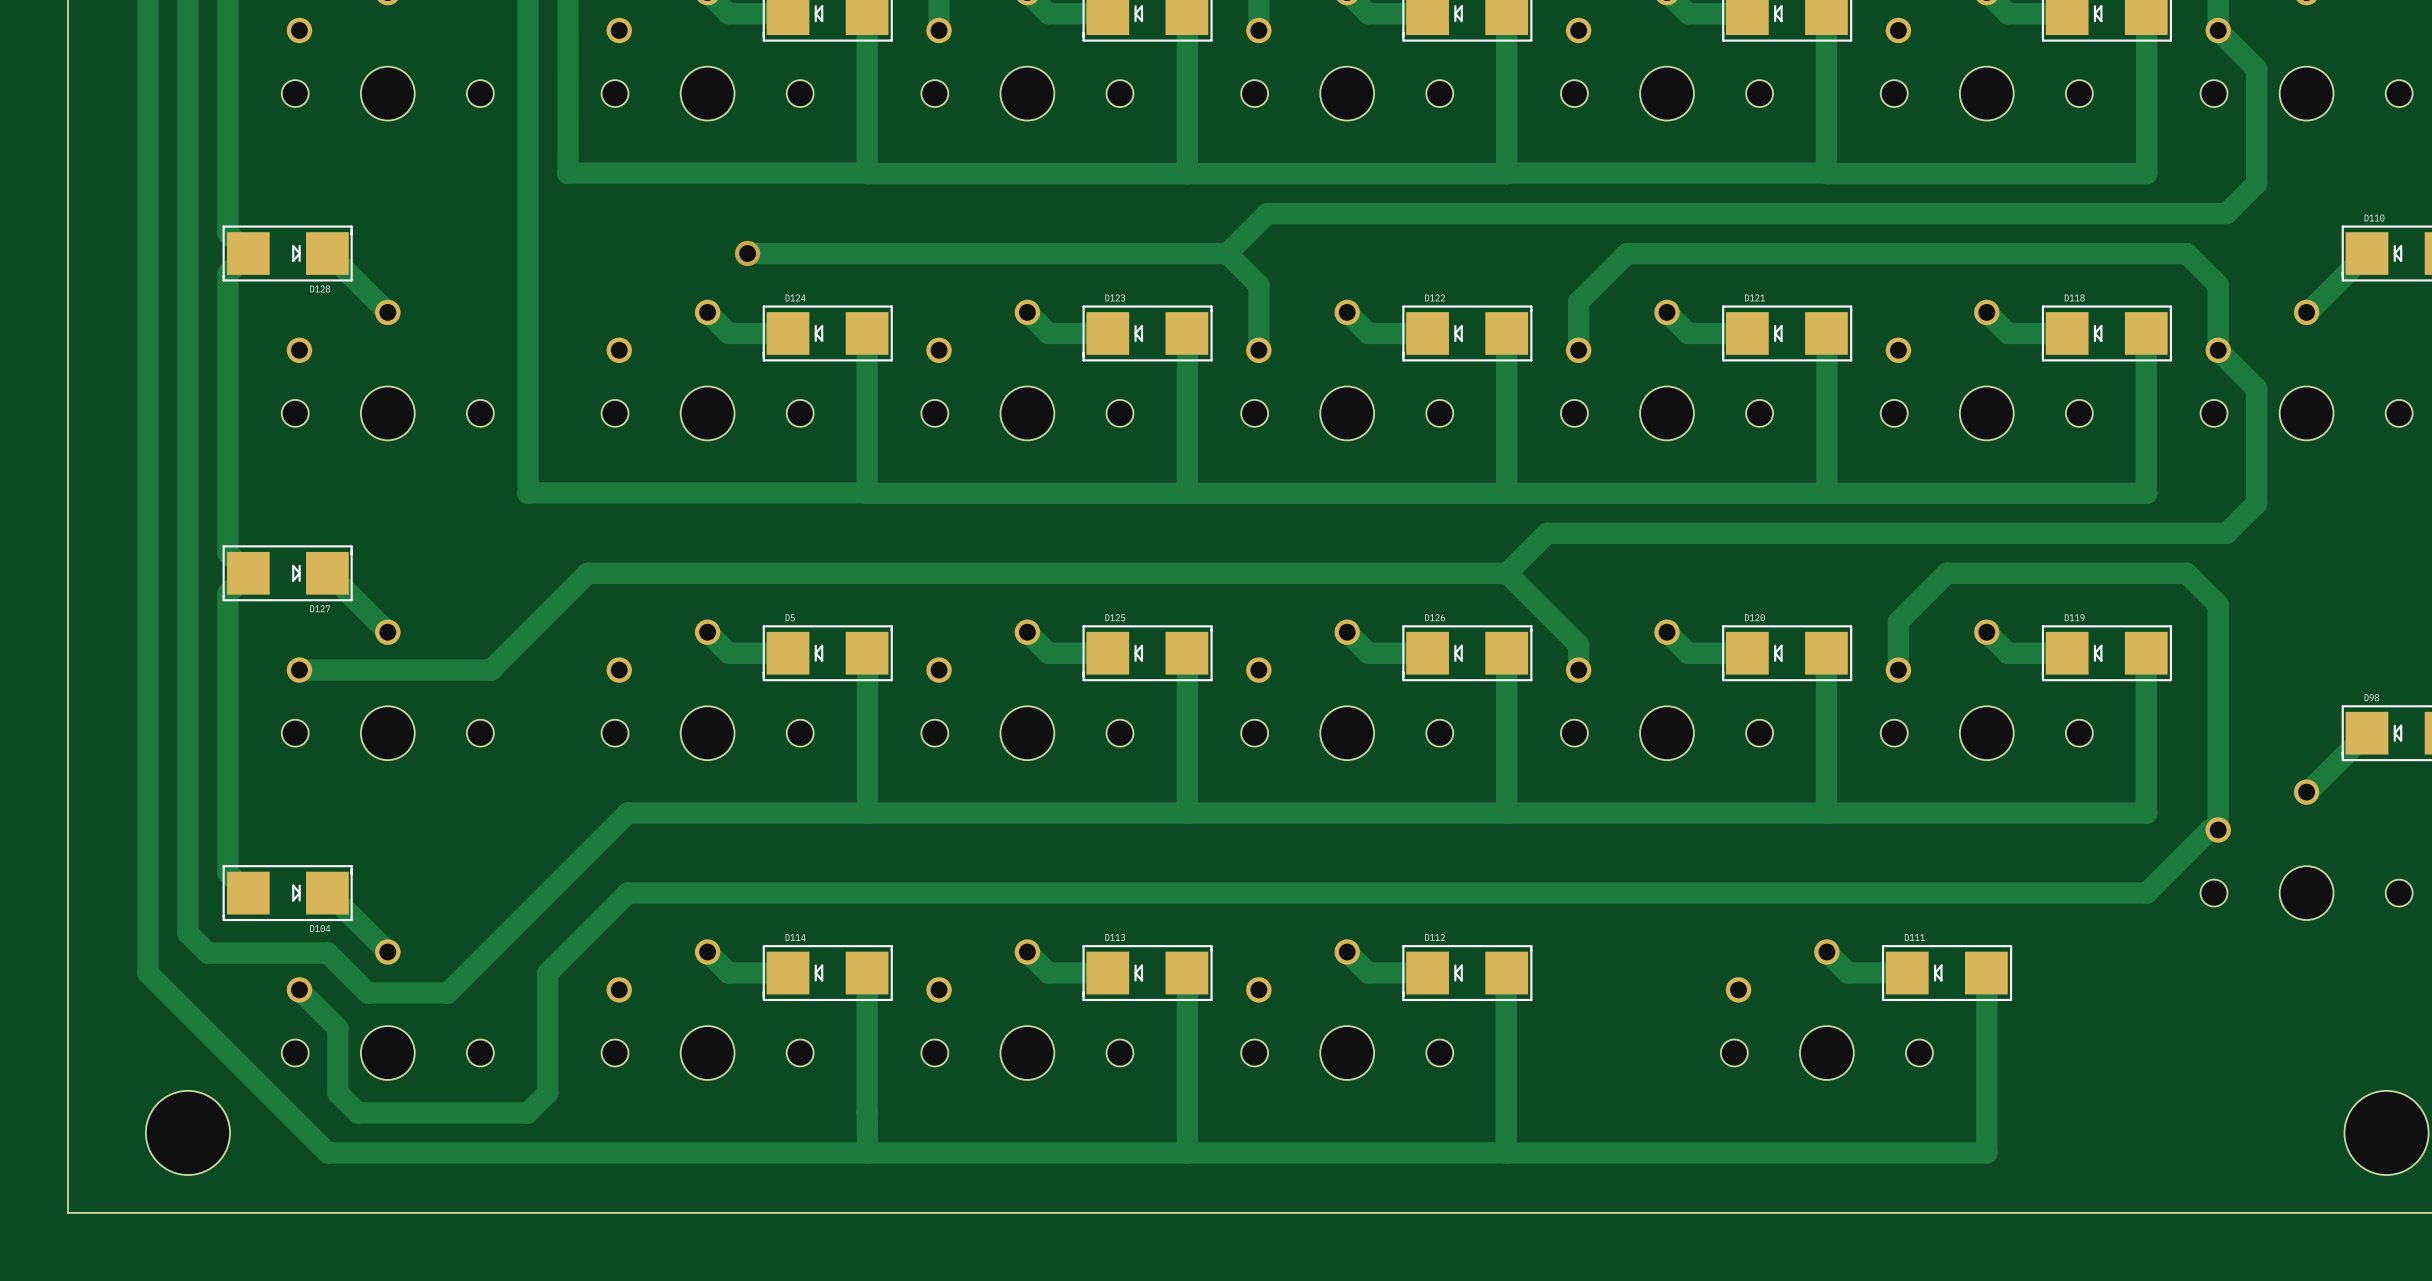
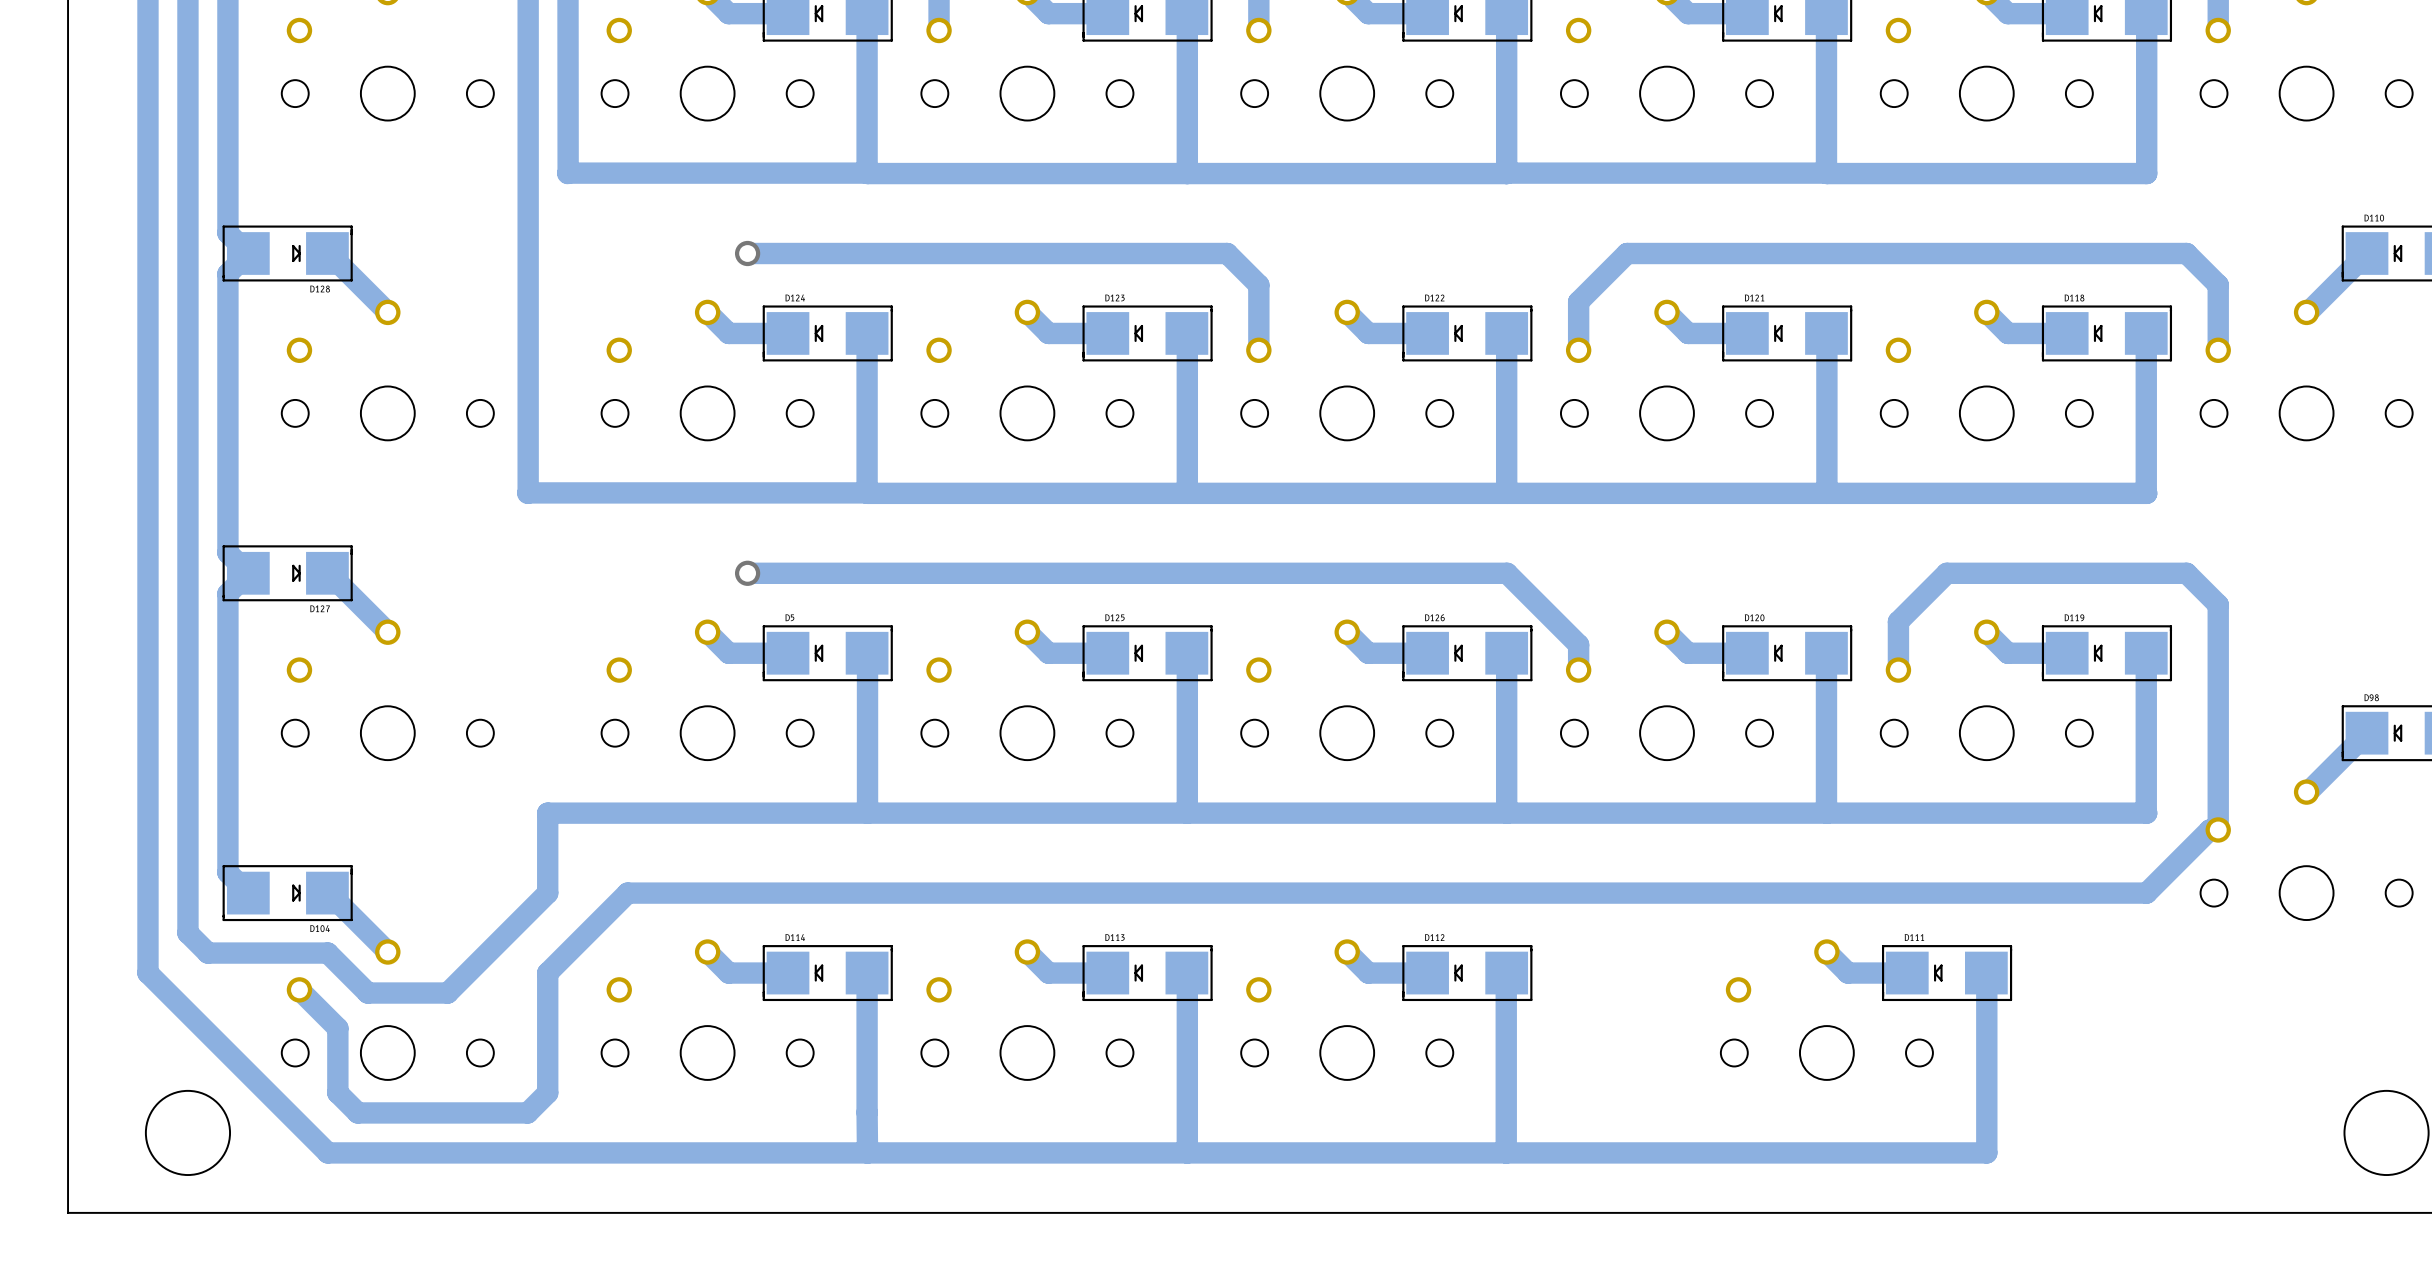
track: (2218, 30) (2256, 68) (2256, 183) (2226, 213) (1267, 213) (1227, 253) -> none
track: (2218, 350) (2256, 388) (2256, 503) (2226, 533) (1547, 533) (1507, 573) -> none
track: (747, 573) (587, 573) (490, 670) (299, 670) -> none
via: none -> (747, 573)
track: (627, 813) (547, 893) -> (627, 813) (547, 813) (547, 893)

